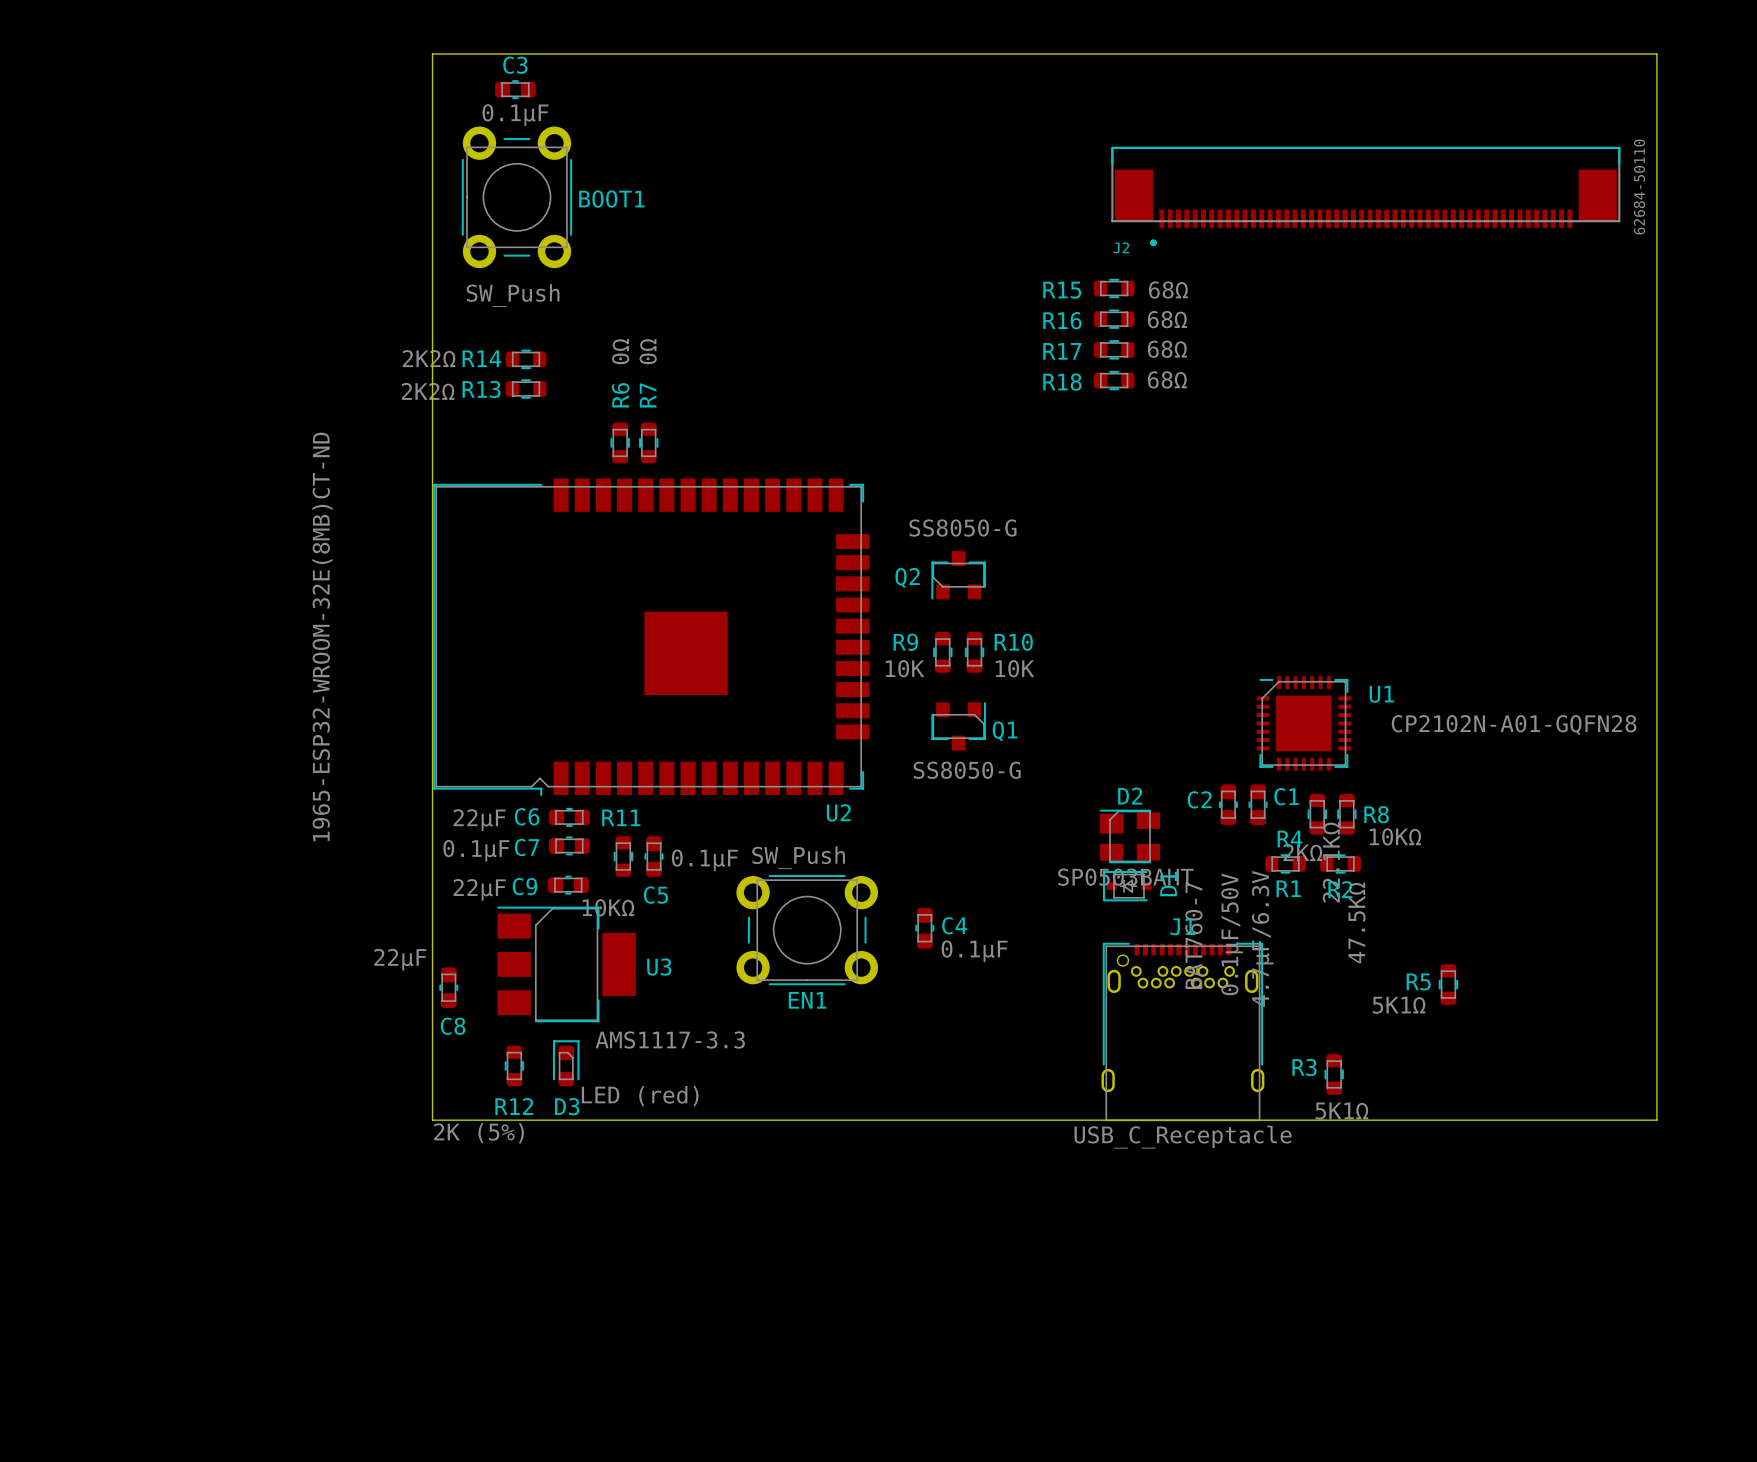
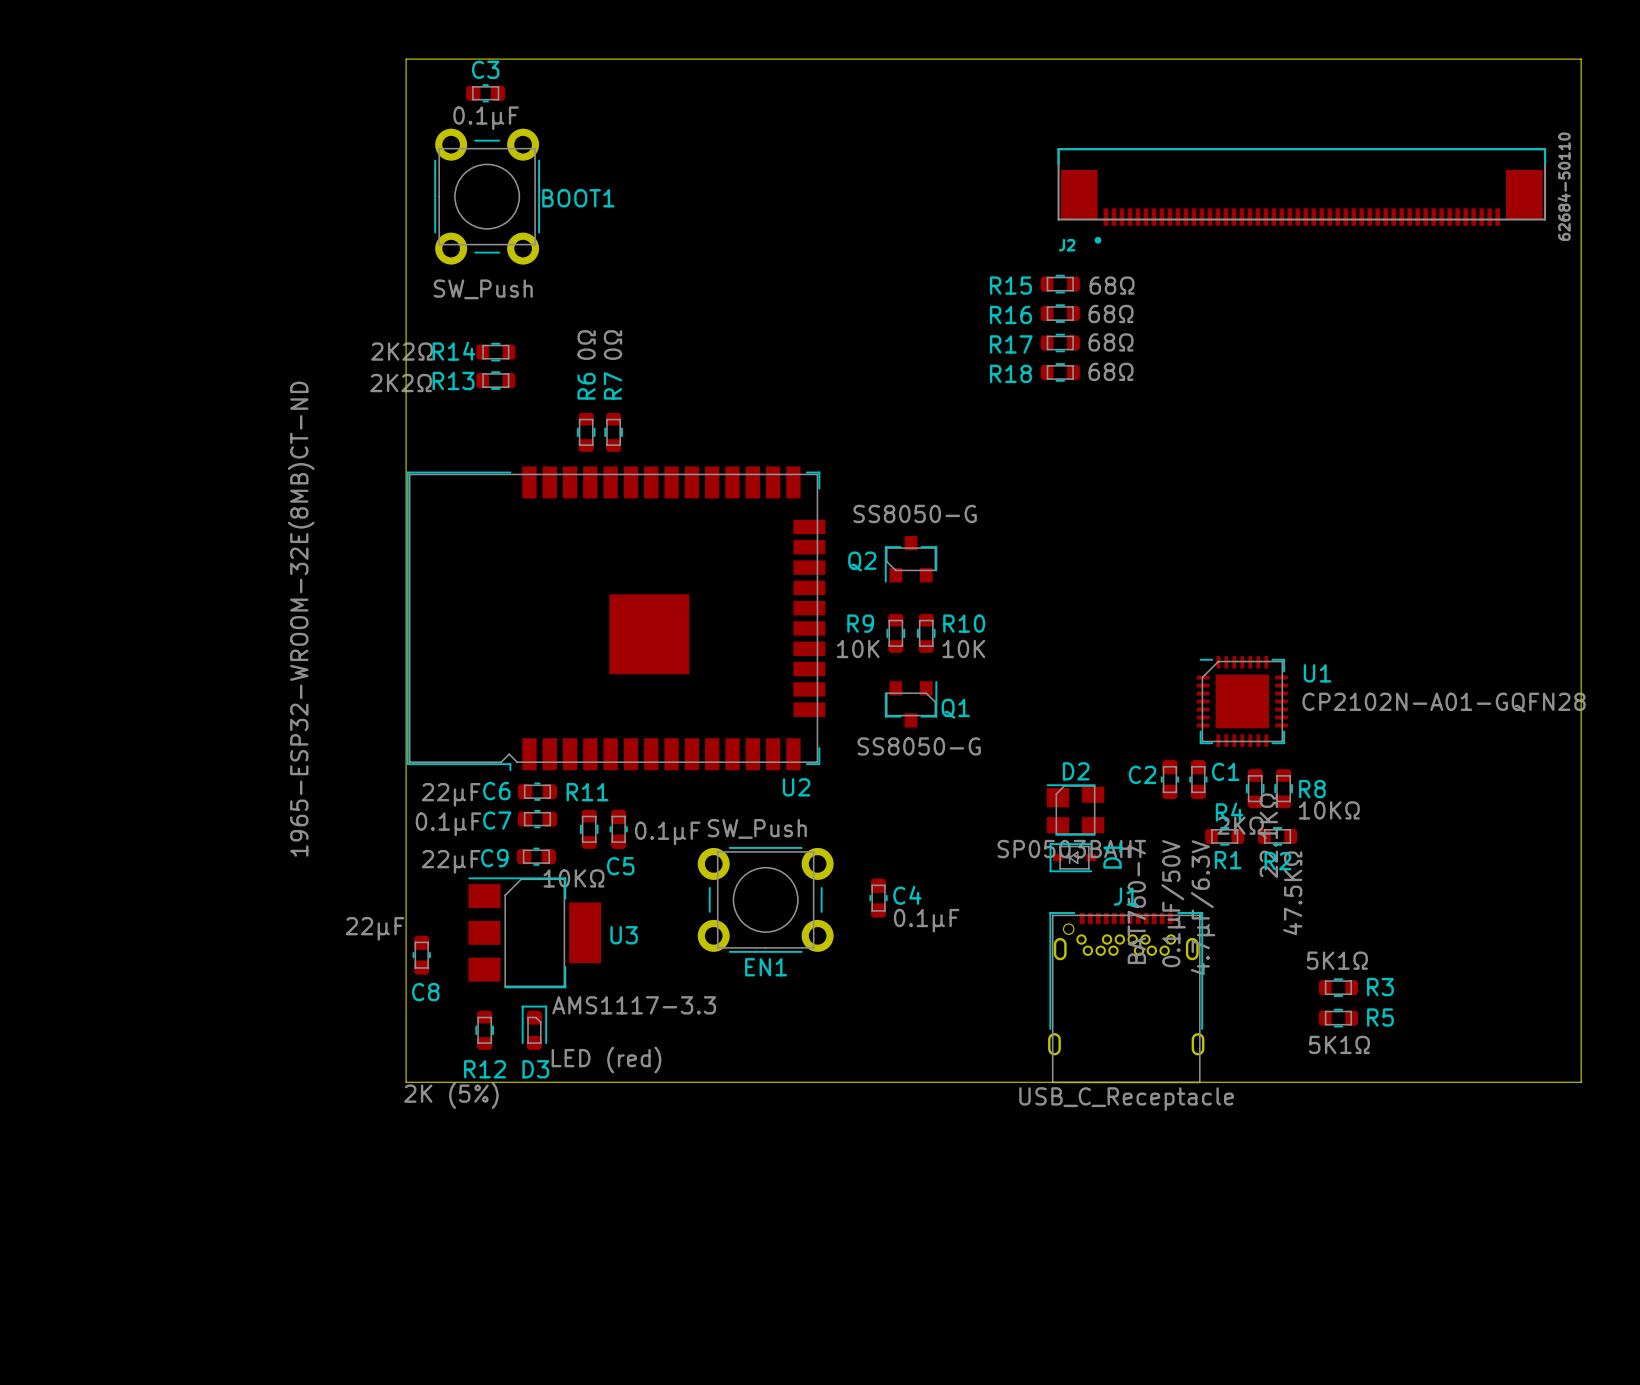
R5 name position: R5 (1418, 981) -> R5 (1380, 1017)
R5 rotation: 0° (1448, 984) -> 90° clockwise (1338, 1018)
R5 position: (1448, 984) -> (1338, 1018)
R3 name position: R3 (1304, 1067) -> R3 (1380, 987)
R3 rotation: 0° (1334, 1074) -> 90° clockwise (1338, 987)
R3 position: (1334, 1074) -> (1338, 987)

